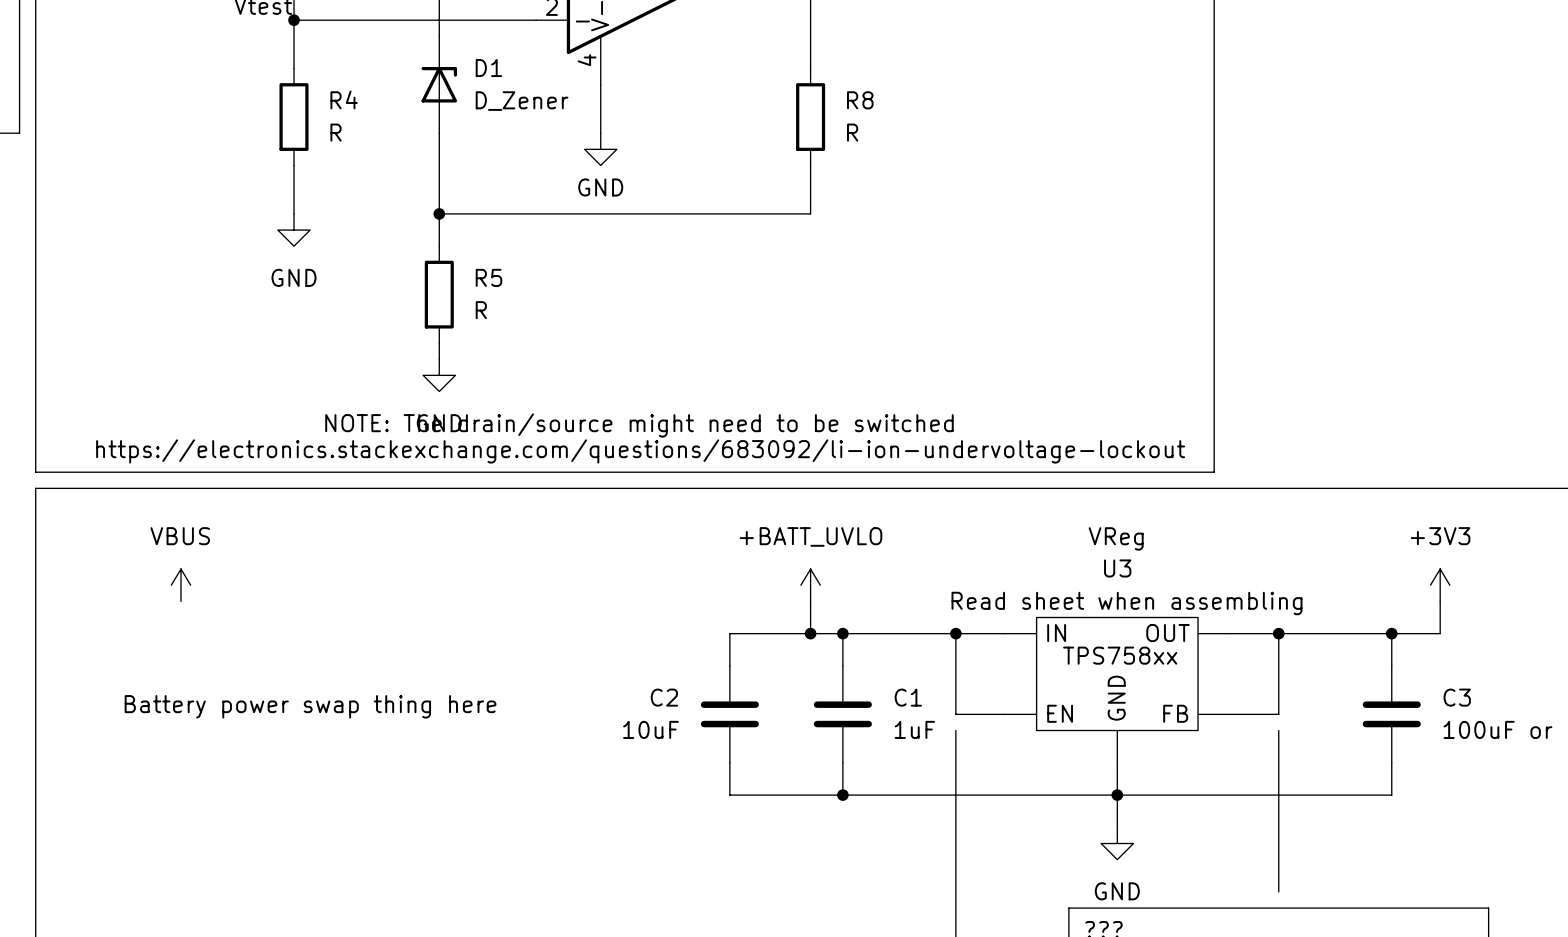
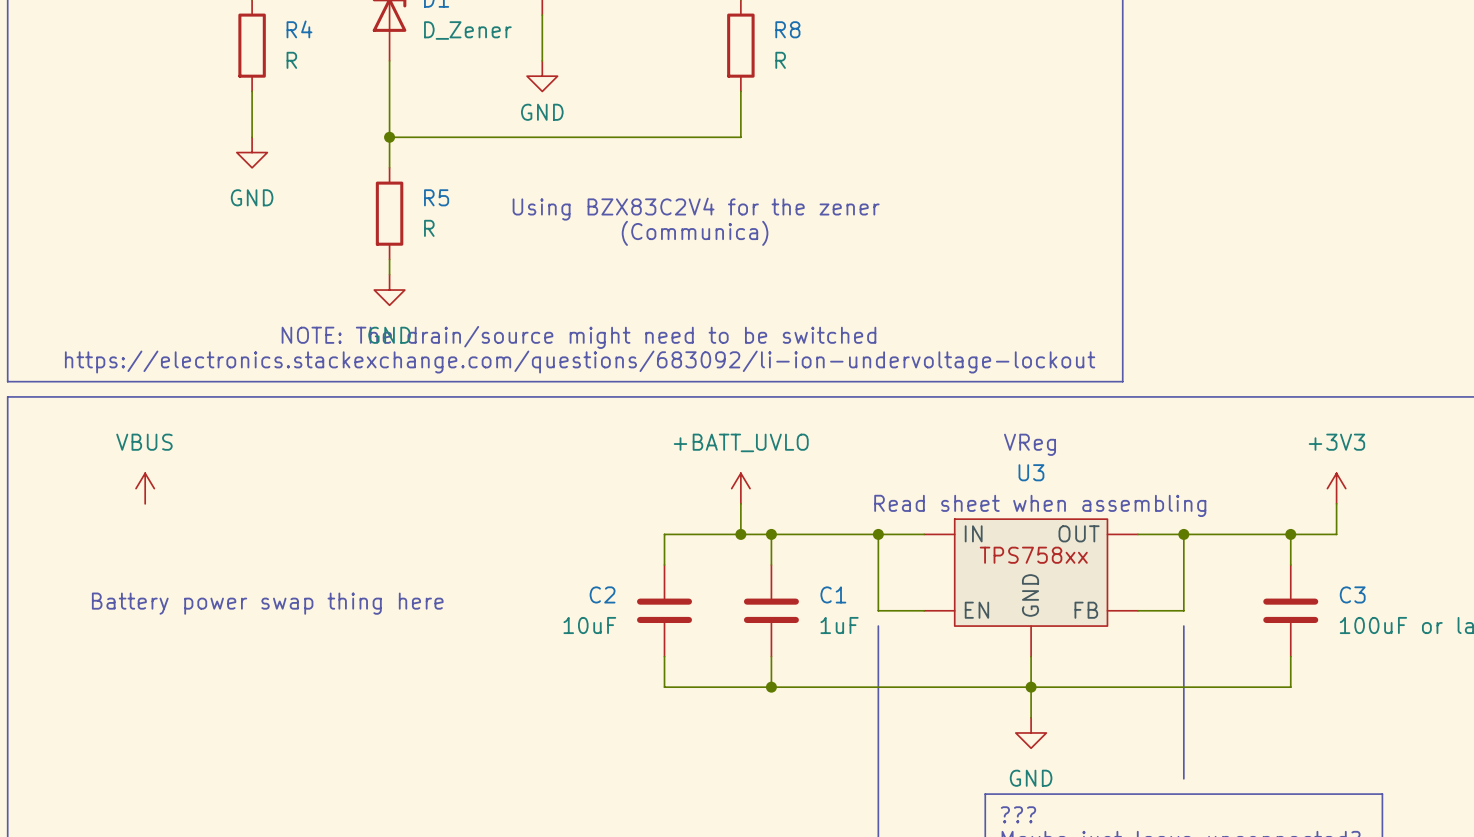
text: none -> Using BZX83C2V4 for the zener (696, 209)
text: none -> (Communica) (695, 233)

